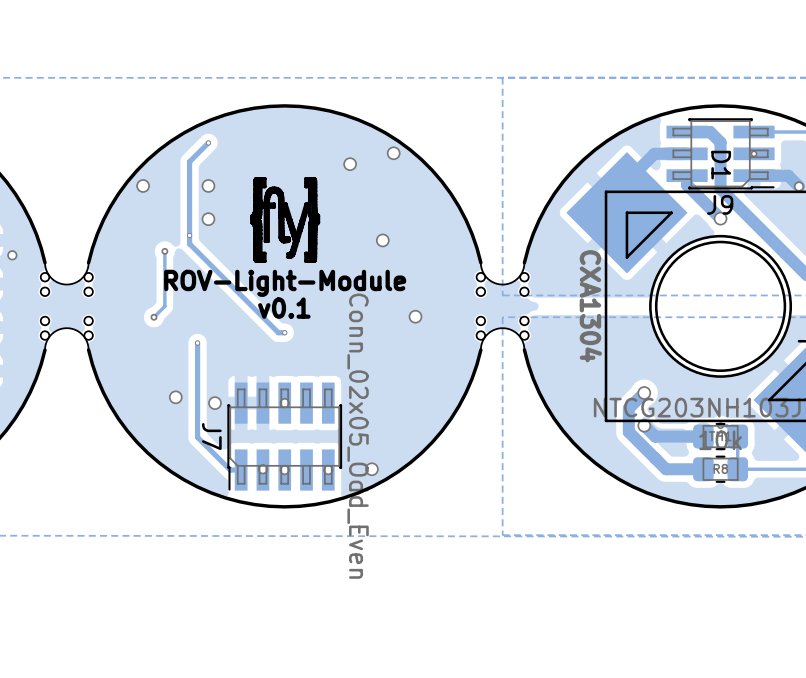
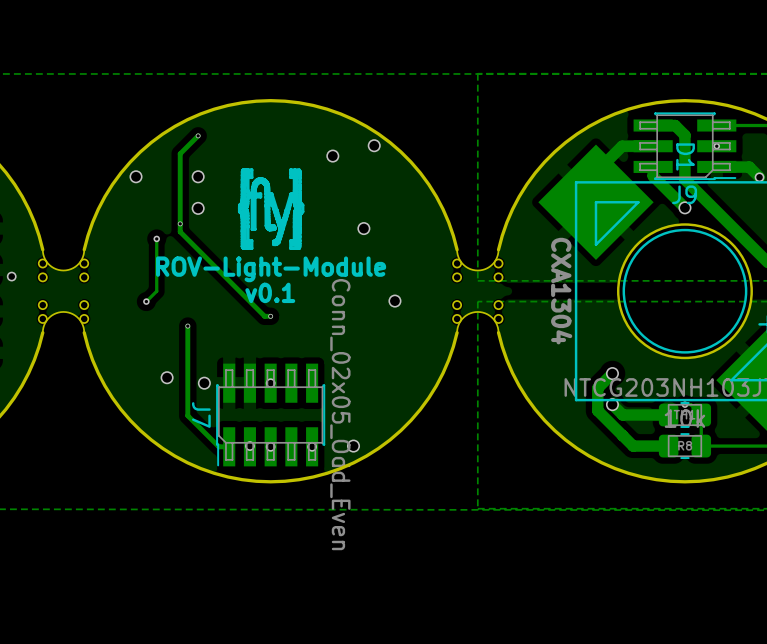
via position: (12, 255) -> (11, 276)

